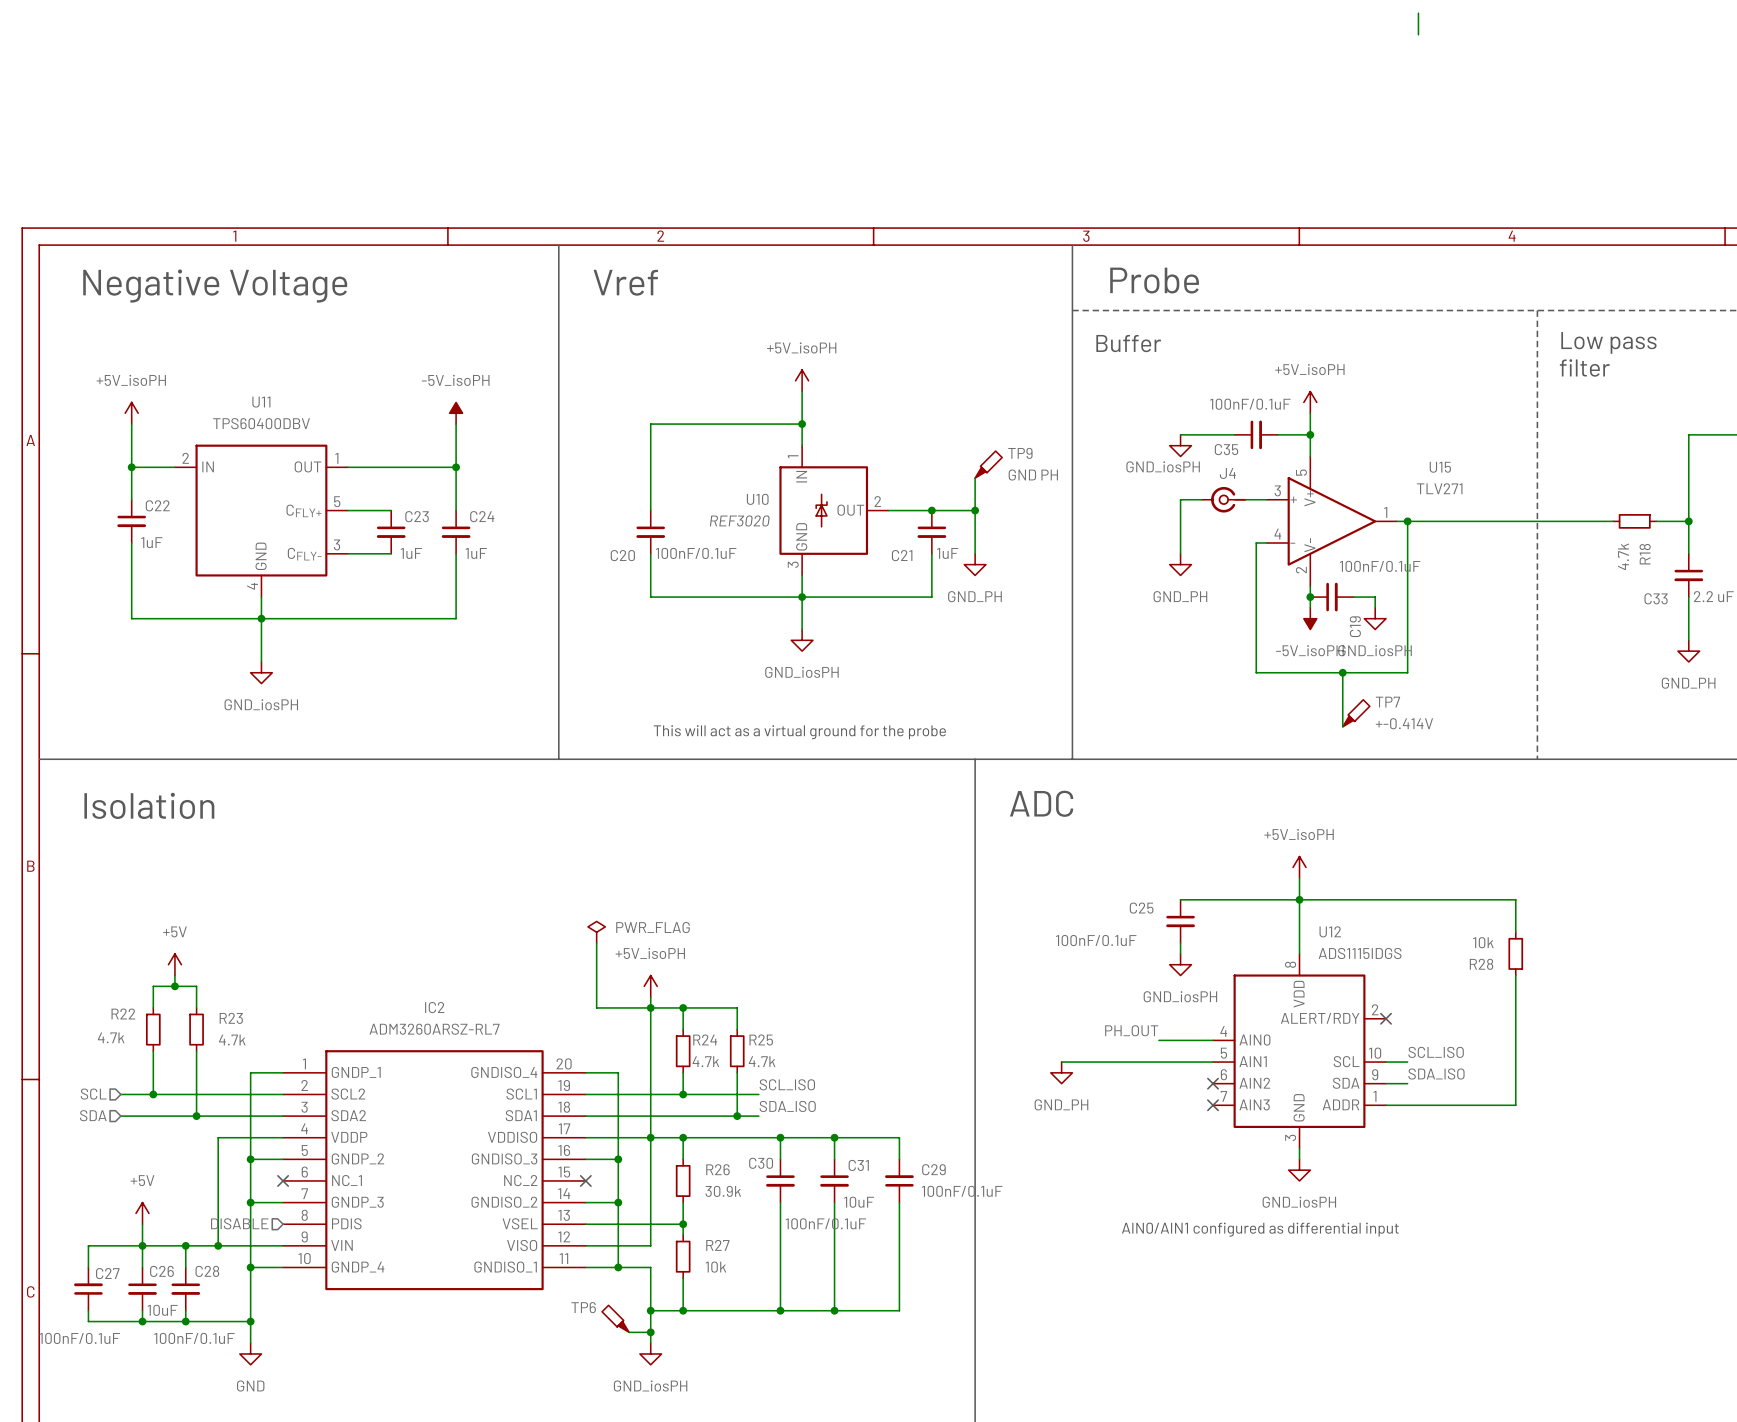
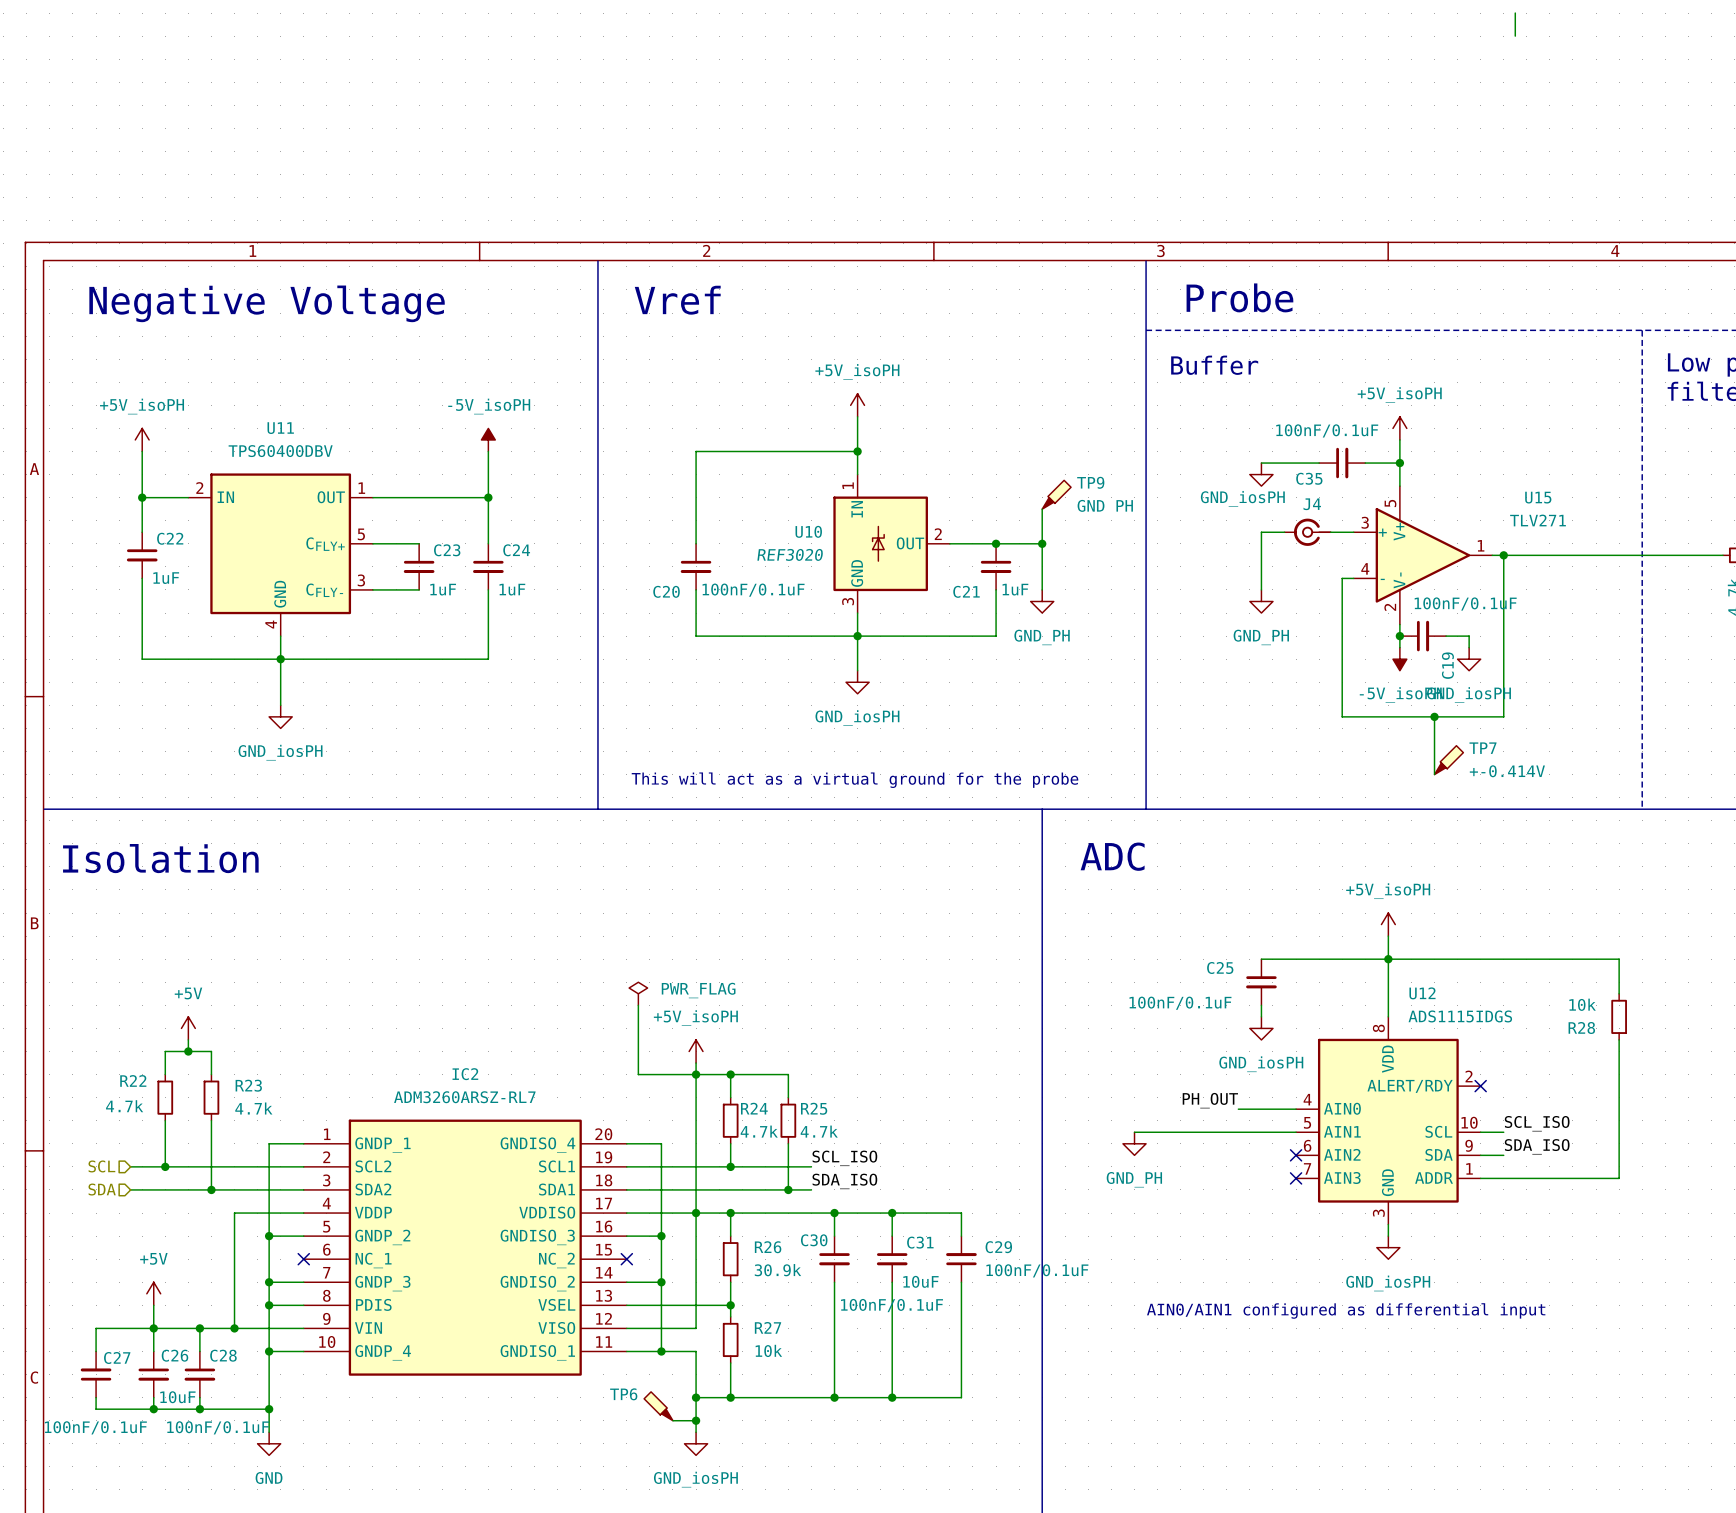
hierarchical label: DISABLE (239, 1223) -> none
wire: none -> (269, 1305) (303, 1305)
junction: none -> (269, 1305)

